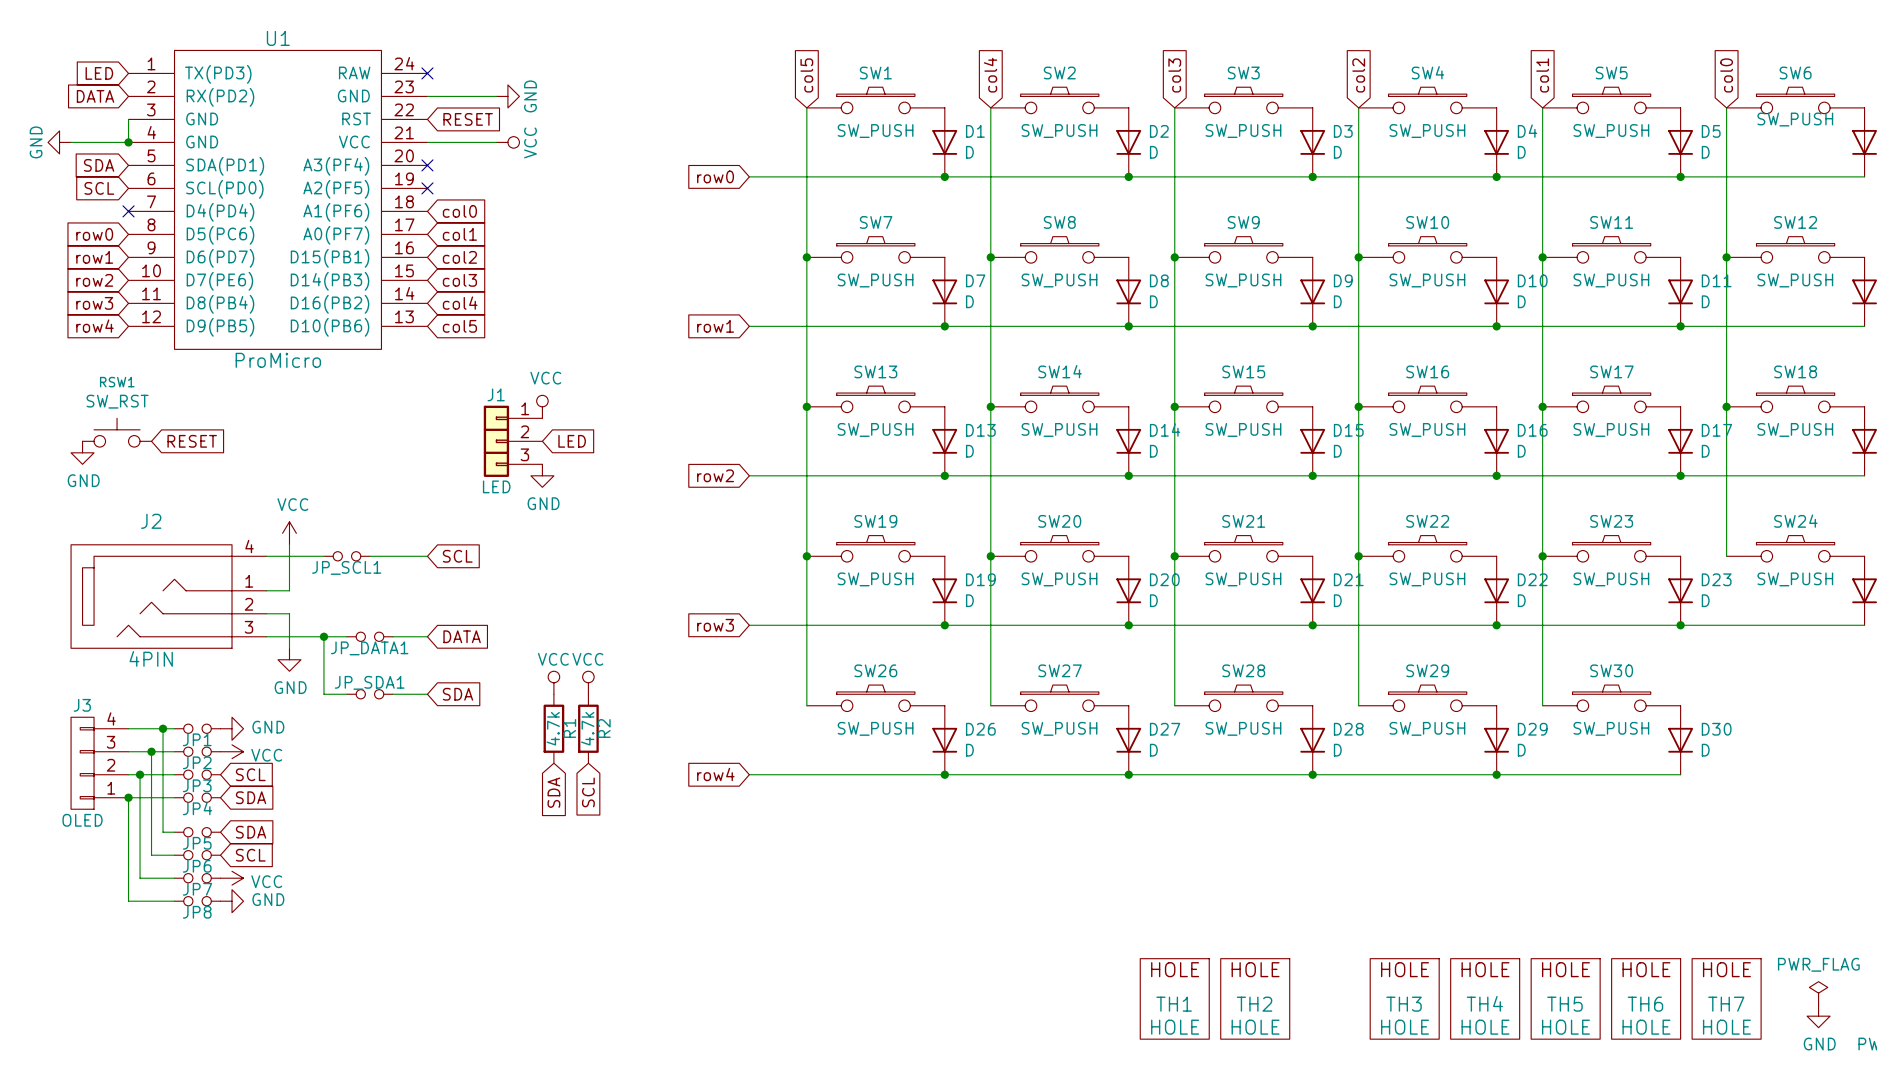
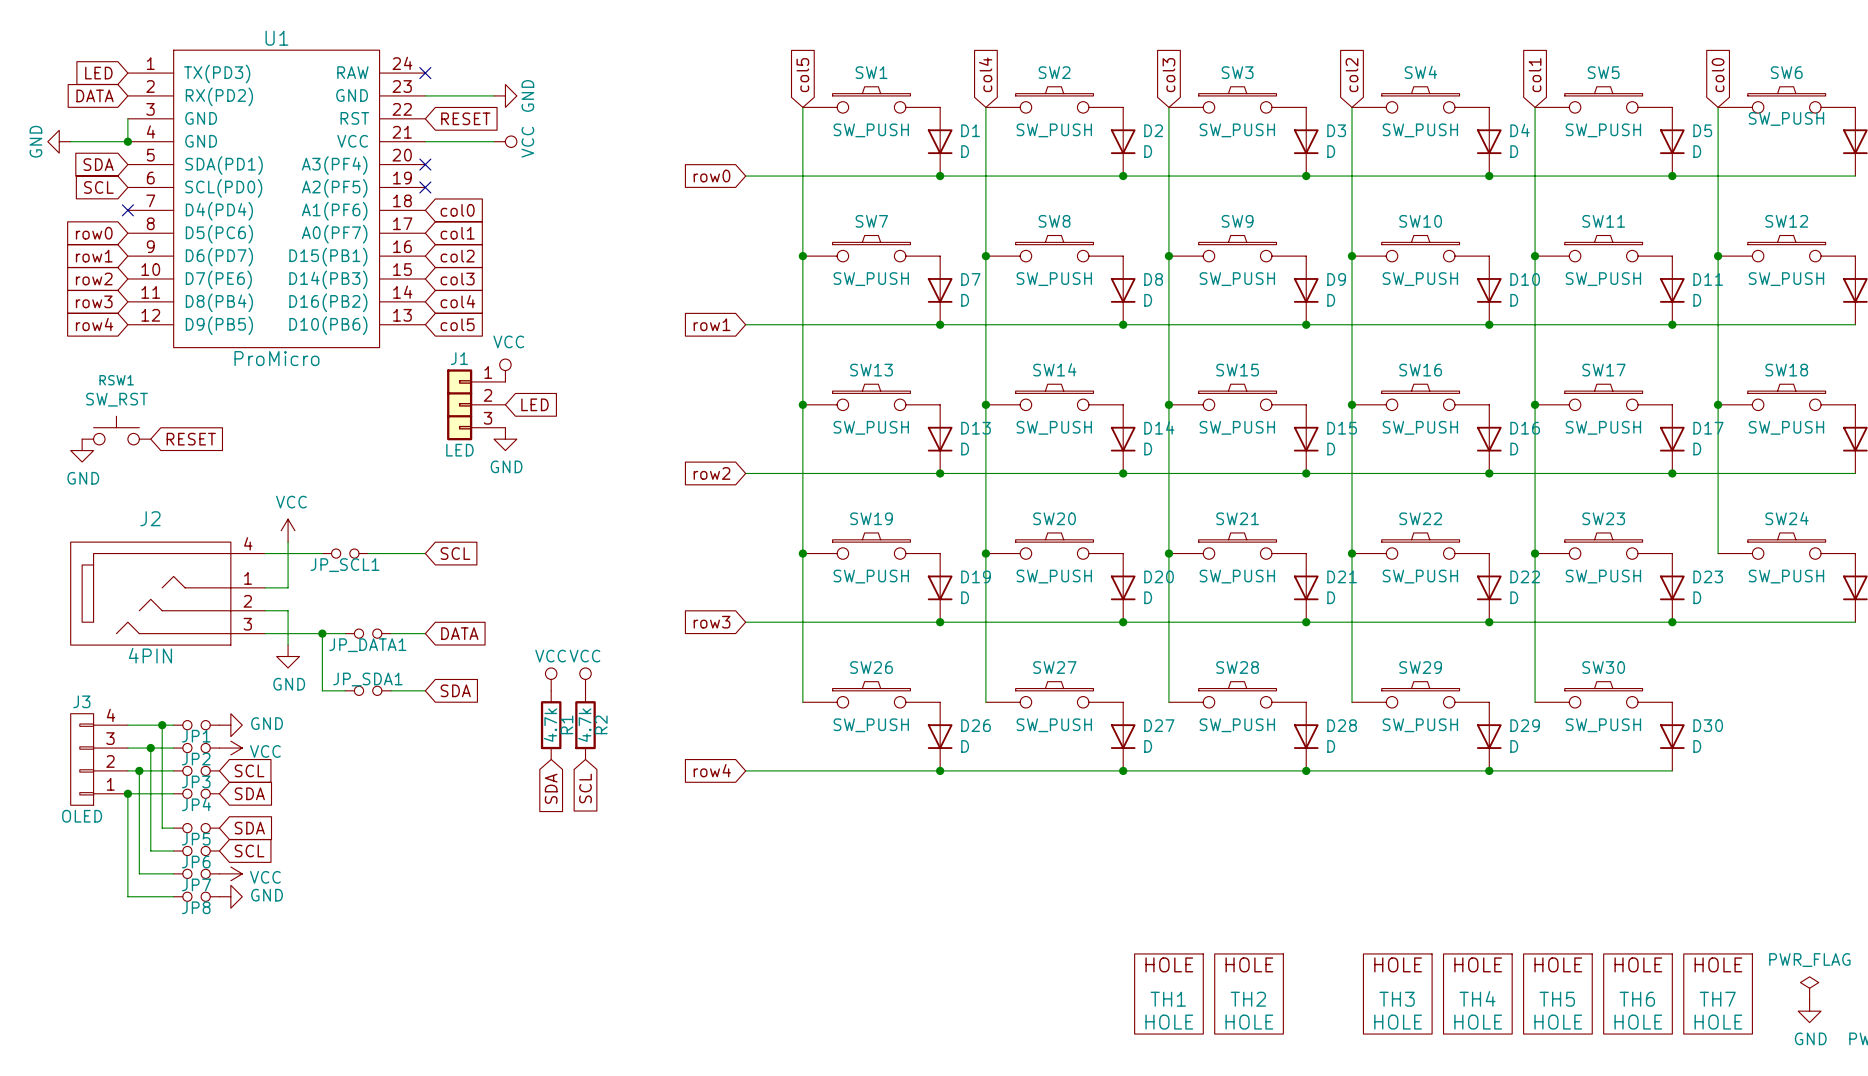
power symbol position: VCC (542, 406) -> VCC (505, 370)
J1 position: (513, 441) -> (476, 404)
global label position: LED (572, 441) -> LED (534, 404)
power symbol position: GND (542, 475) -> GND (505, 439)

